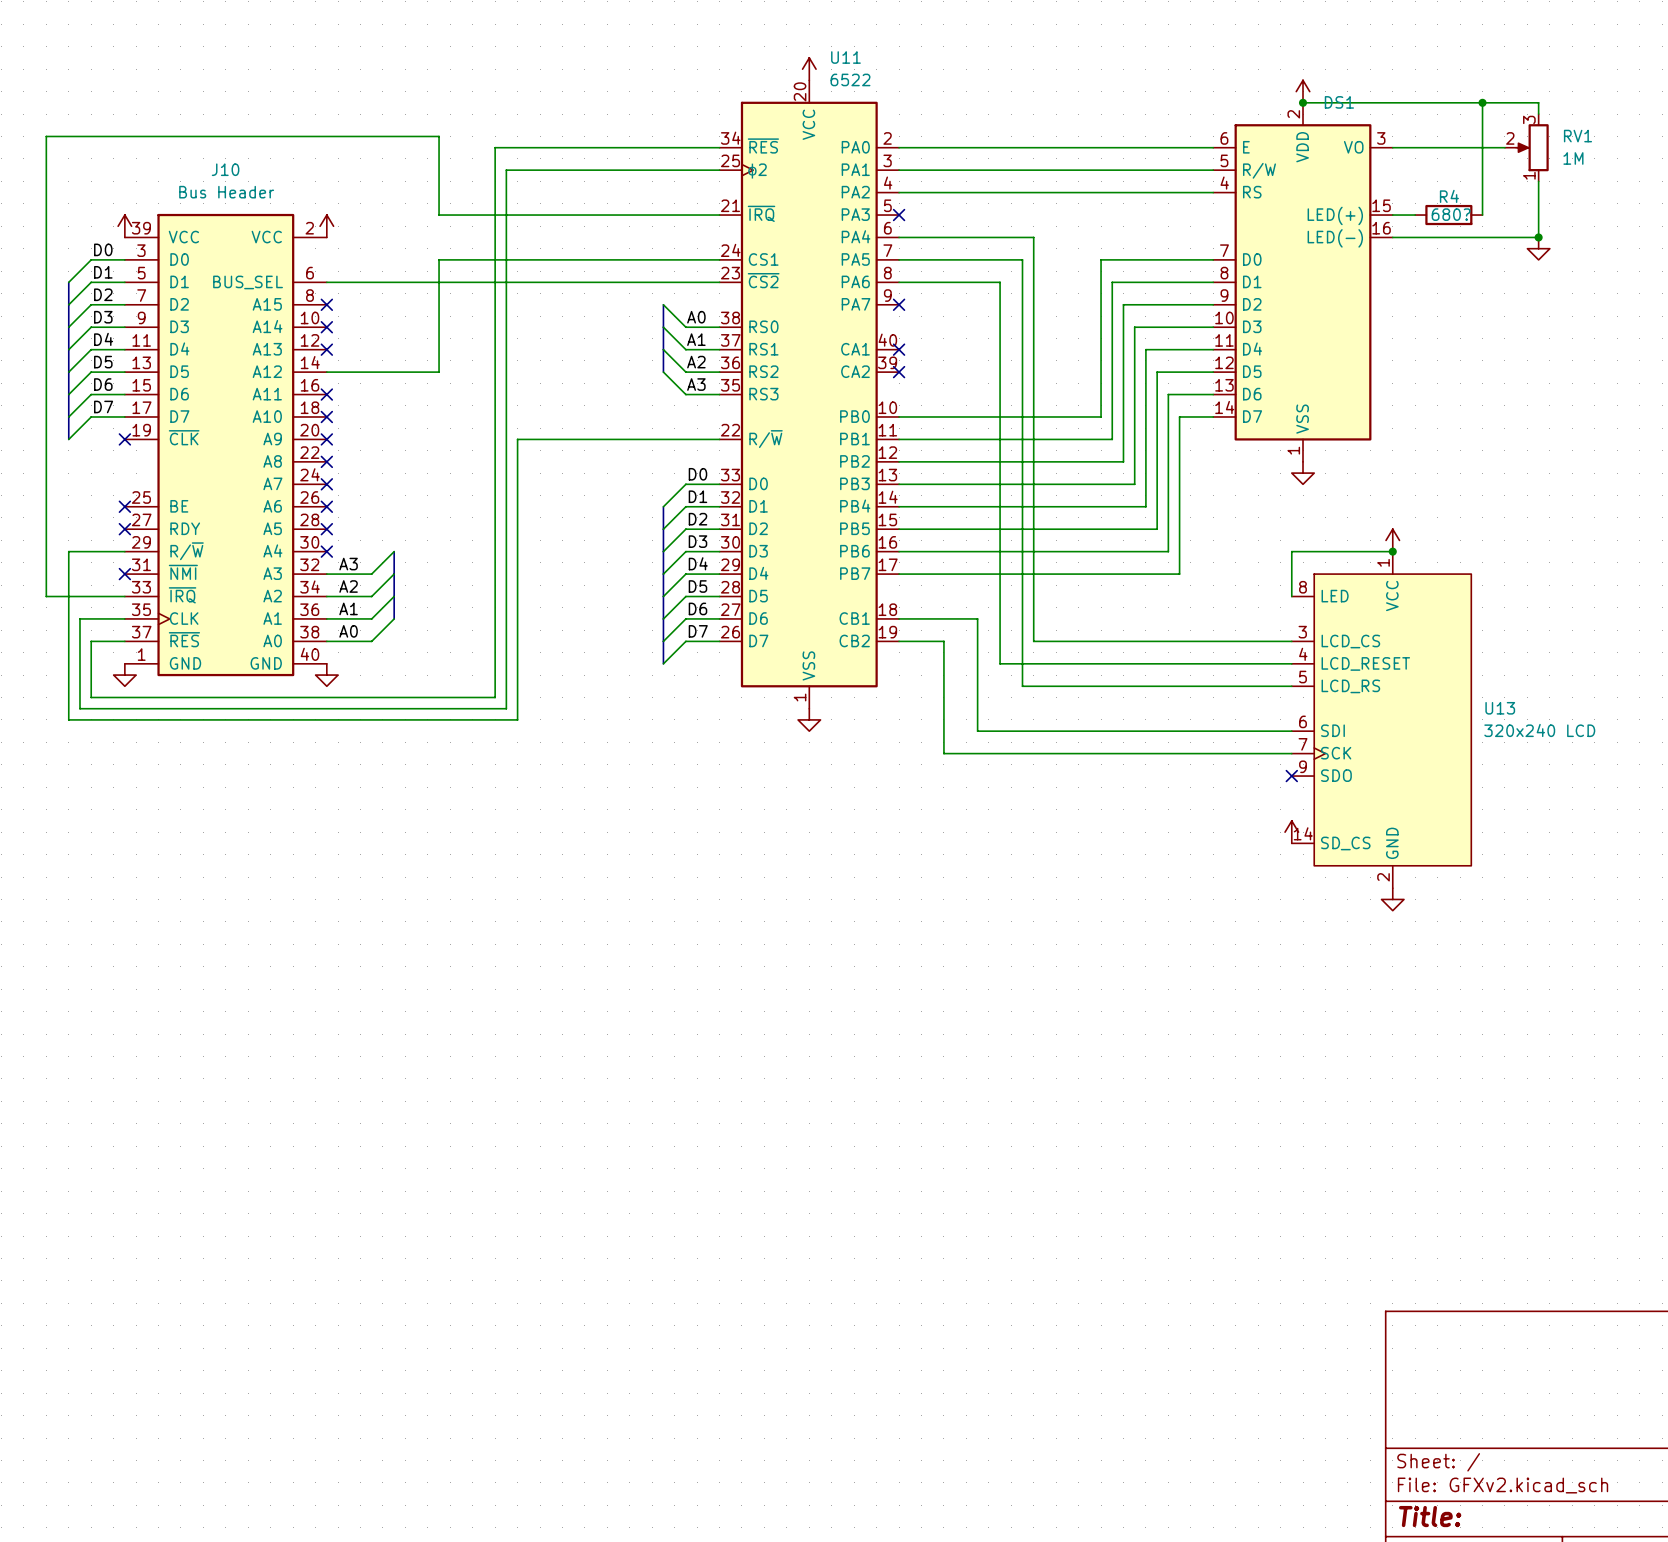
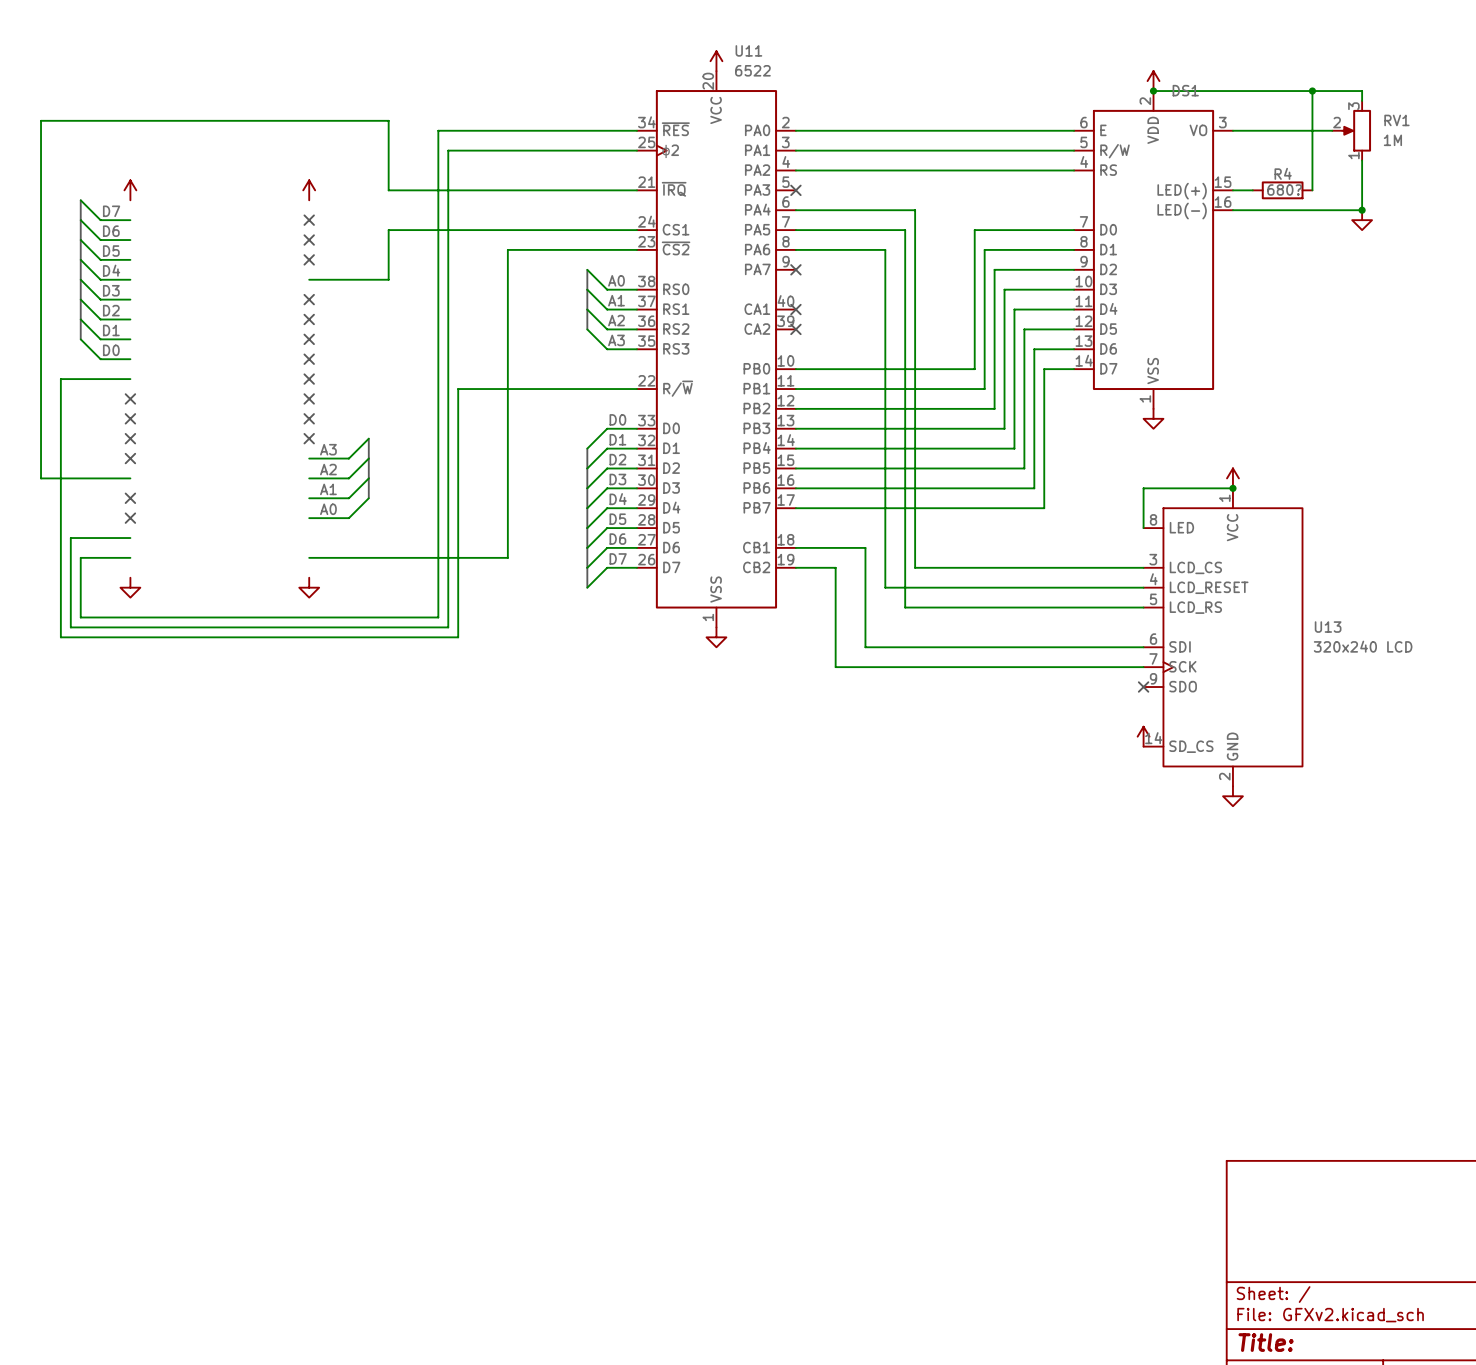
wire: none -> (80, 200) (100, 220) (130, 220)
power symbol position: (124, 226) -> (130, 190)
power symbol position: (326, 226) -> (309, 190)
wire: none -> (80, 220) (100, 240) (130, 240)
no-connect mark: none -> (309, 220)
label position: D0 (103, 249) -> D0 (111, 350)
wire: (124, 259) (91, 259) (68, 282) -> none
wire: none -> (80, 240) (100, 259) (130, 259)
no-connect mark: none -> (309, 240)
label position: D1 (103, 272) -> D1 (111, 330)
bus: (68, 282) (68, 439) -> (80, 200) (80, 339)
wire: (124, 282) (91, 282) (68, 304) -> none
wire: (326, 282) (573, 282) -> (309, 557) (507, 557) (507, 249)
wire: none -> (80, 259) (100, 279) (130, 279)
no-connect mark: none -> (309, 259)
label position: D2 (103, 294) -> D2 (111, 310)
wire: (124, 304) (91, 304) (68, 327) -> none
no-connect mark: (326, 304) -> none
wire: none -> (80, 279) (100, 299) (130, 299)
wire: (439, 316) (439, 372) (326, 372) -> (388, 279) (309, 279)
label position: D3 (103, 317) -> D3 (111, 290)
wire: (124, 327) (91, 327) (68, 349) -> none
no-connect mark: (326, 327) -> none
wire: none -> (80, 299) (100, 319) (130, 319)
no-connect mark: none -> (309, 299)
label position: D4 (103, 339) -> D4 (111, 270)
wire: (124, 349) (91, 349) (68, 372) -> none
no-connect mark: (326, 349) -> none
wire: none -> (80, 319) (100, 339) (130, 339)
no-connect mark: none -> (309, 319)
label position: D5 (103, 362) -> D5 (111, 251)
wire: (124, 372) (91, 372) (68, 394) -> none
wire: none -> (80, 339) (100, 359) (130, 359)
no-connect mark: none -> (309, 339)
label position: D6 (103, 384) -> D6 (111, 231)
wire: (124, 394) (91, 394) (68, 416) -> none
no-connect mark: (326, 394) -> none
no-connect mark: none -> (309, 359)
label position: D7 (103, 406) -> D7 (111, 211)
wire: (124, 416) (91, 416) (68, 439) -> none
no-connect mark: (326, 416) -> none
no-connect mark: none -> (309, 379)
no-connect mark: (124, 439) -> none
no-connect mark: (326, 439) -> none
J10: Bus Header (225, 445) -> none
no-connect mark: none -> (130, 398)
no-connect mark: none -> (309, 398)
no-connect mark: (326, 461) -> none
no-connect mark: none -> (130, 418)
no-connect mark: none -> (309, 418)
no-connect mark: (326, 484) -> none
no-connect mark: none -> (130, 438)
no-connect mark: none -> (309, 438)
no-connect mark: (124, 506) -> none
no-connect mark: (326, 506) -> none
no-connect mark: none -> (130, 458)
no-connect mark: (124, 529) -> none
no-connect mark: (326, 529) -> none
wire: (46, 540) (46, 596) (124, 596) -> (41, 478) (130, 478)
wire: (68, 551) (124, 551) -> (60, 488) (60, 379) (130, 379)
no-connect mark: (326, 551) -> none
wire: (394, 551) (371, 574) (326, 574) -> (368, 438) (348, 458) (309, 458)
bus: (394, 551) (394, 618) -> (368, 438) (368, 498)
no-connect mark: none -> (130, 498)
label position: A3 (348, 564) -> A3 (328, 449)
no-connect mark: (124, 574) -> none
wire: (394, 574) (371, 596) (326, 596) -> (368, 458) (348, 478) (309, 478)
no-connect mark: none -> (130, 518)
label position: A2 (348, 586) -> A2 (328, 469)
wire: (394, 596) (371, 618) (326, 618) -> (368, 478) (348, 498) (309, 498)
label position: A1 (348, 608) -> A1 (328, 489)
wire: (79, 618) (124, 618) -> (70, 547) (70, 538) (130, 538)
wire: (394, 618) (371, 641) (326, 641) -> (368, 498) (348, 518) (309, 518)
label position: A0 (348, 631) -> A0 (328, 509)
wire: (91, 641) (124, 641) -> (80, 567) (80, 557) (130, 557)
power symbol position: (124, 675) -> (130, 587)
power symbol position: (326, 675) -> (309, 587)

